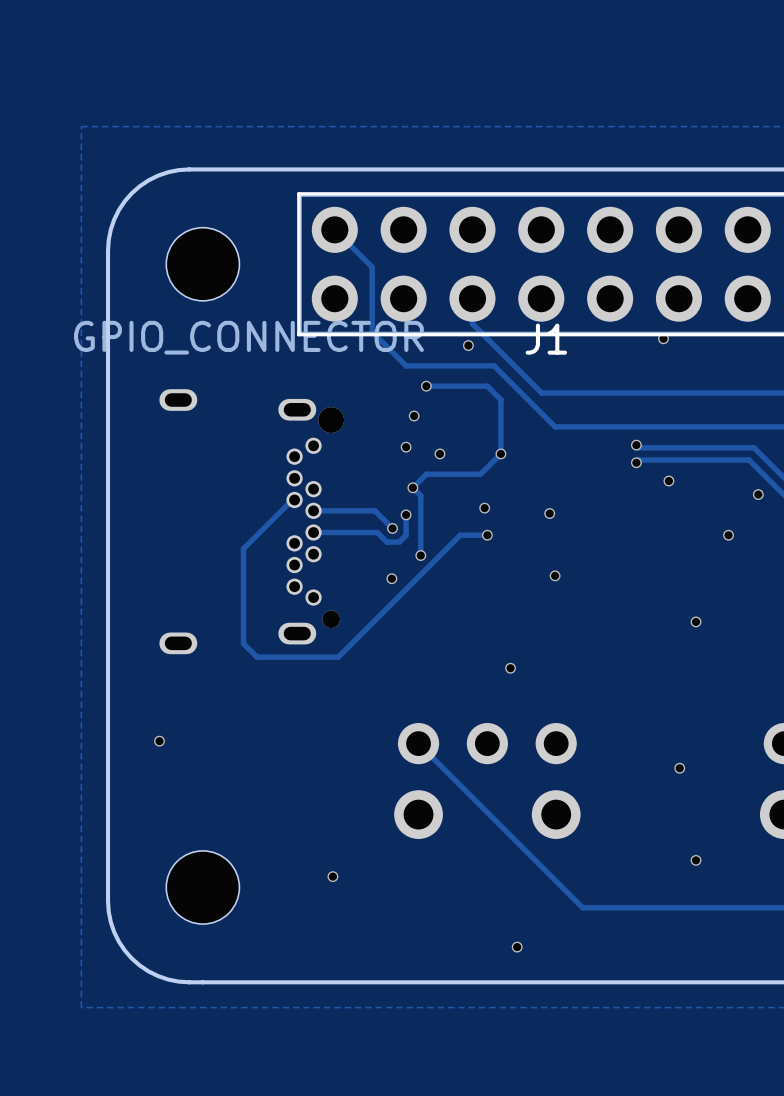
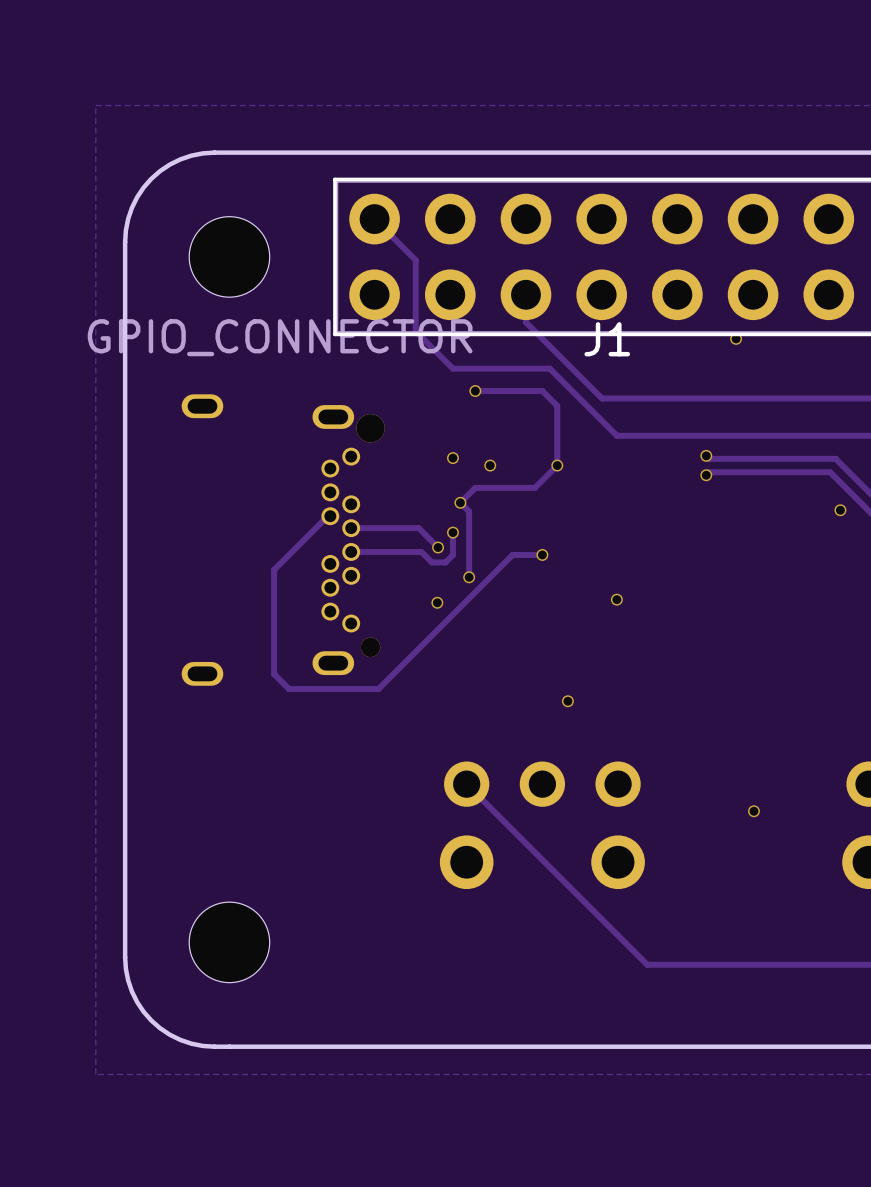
via: (468, 345) -> none
via: (414, 416) -> none
via: (668, 481) -> none
via: (484, 508) -> none
via: (549, 513) -> none
via: (728, 535) -> none
via: (696, 621) -> none
via: (159, 741) -> none
via: (696, 860) -> none
via: (332, 876) -> none
via: (517, 947) -> none

